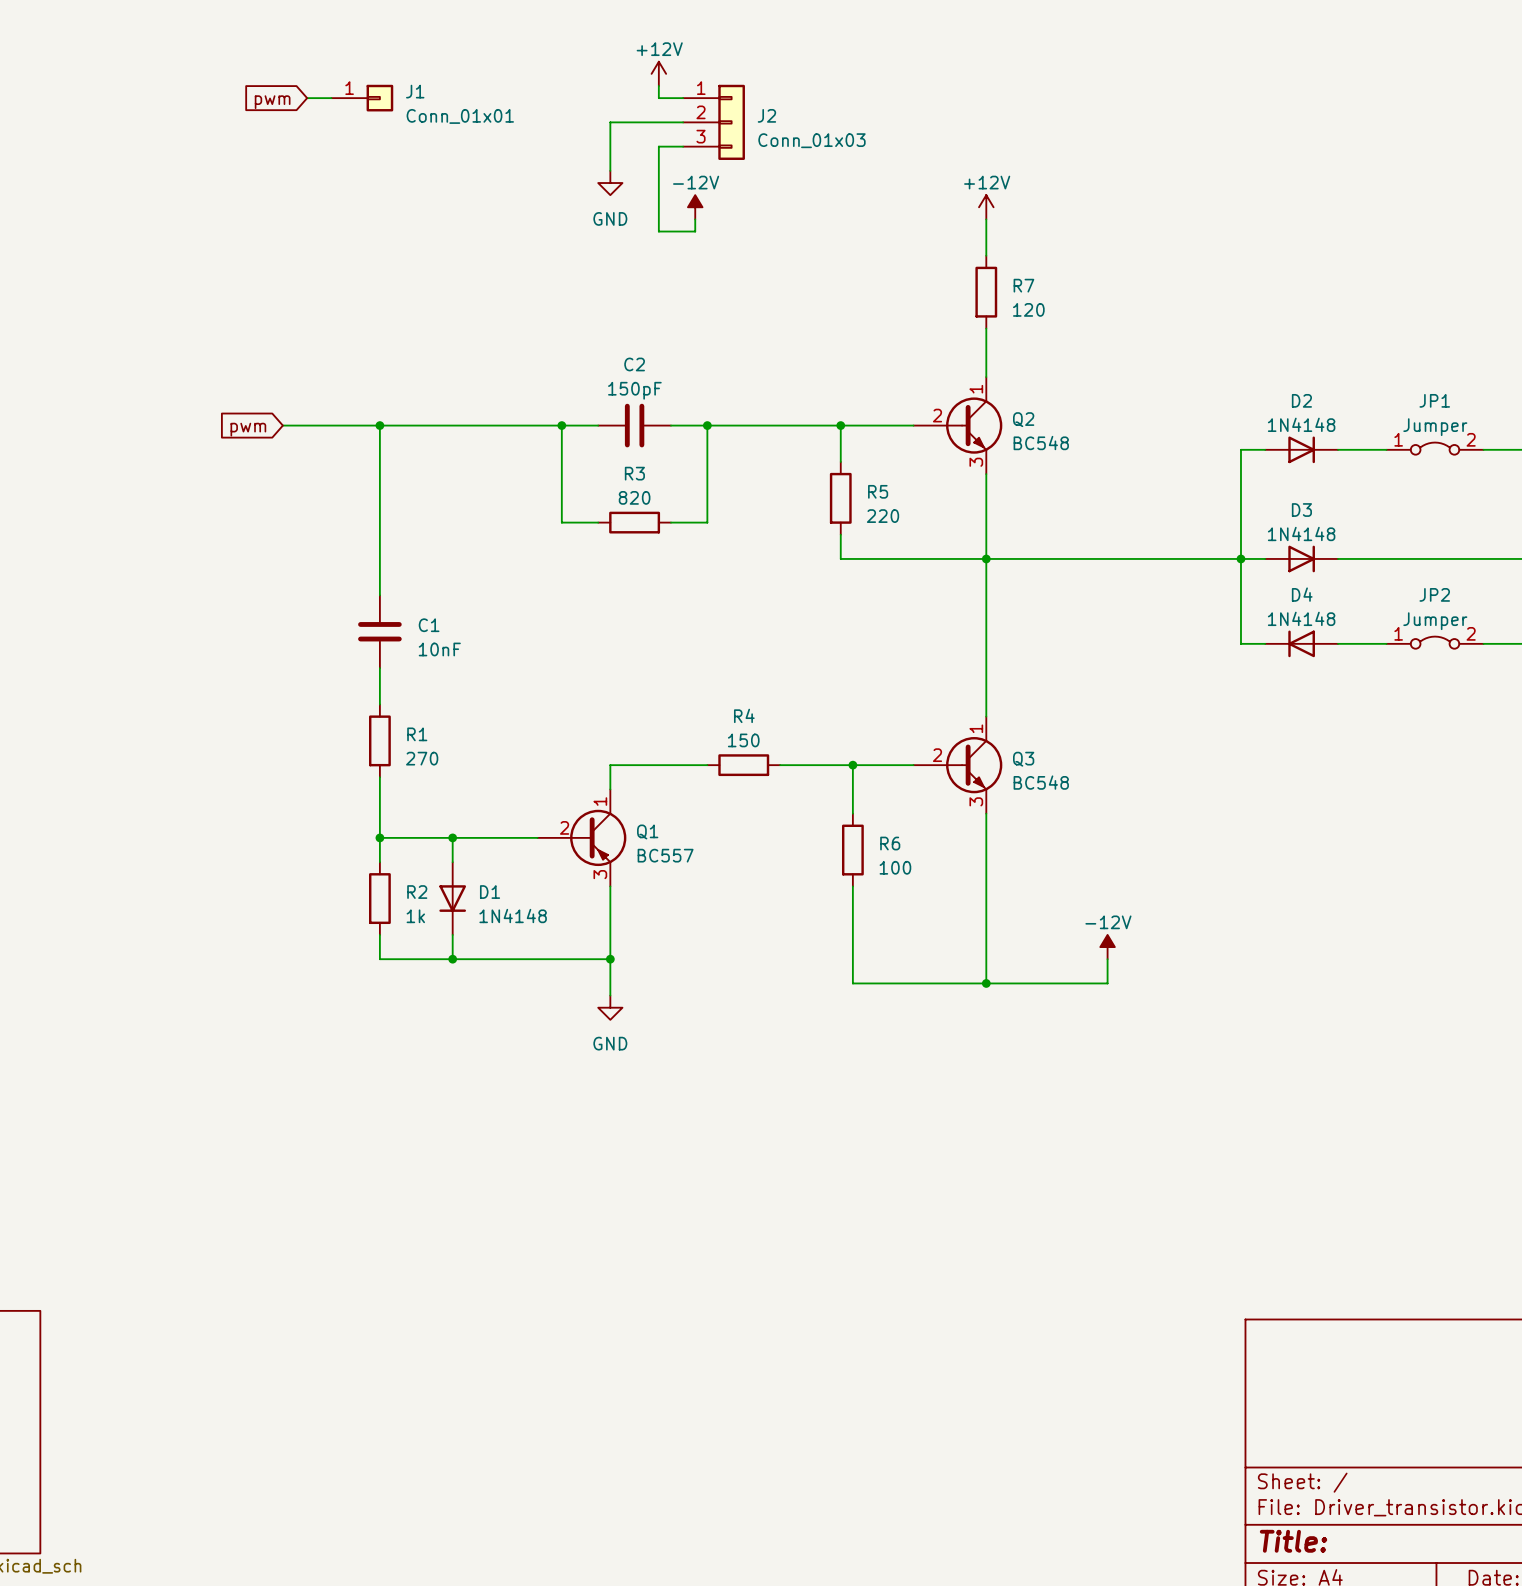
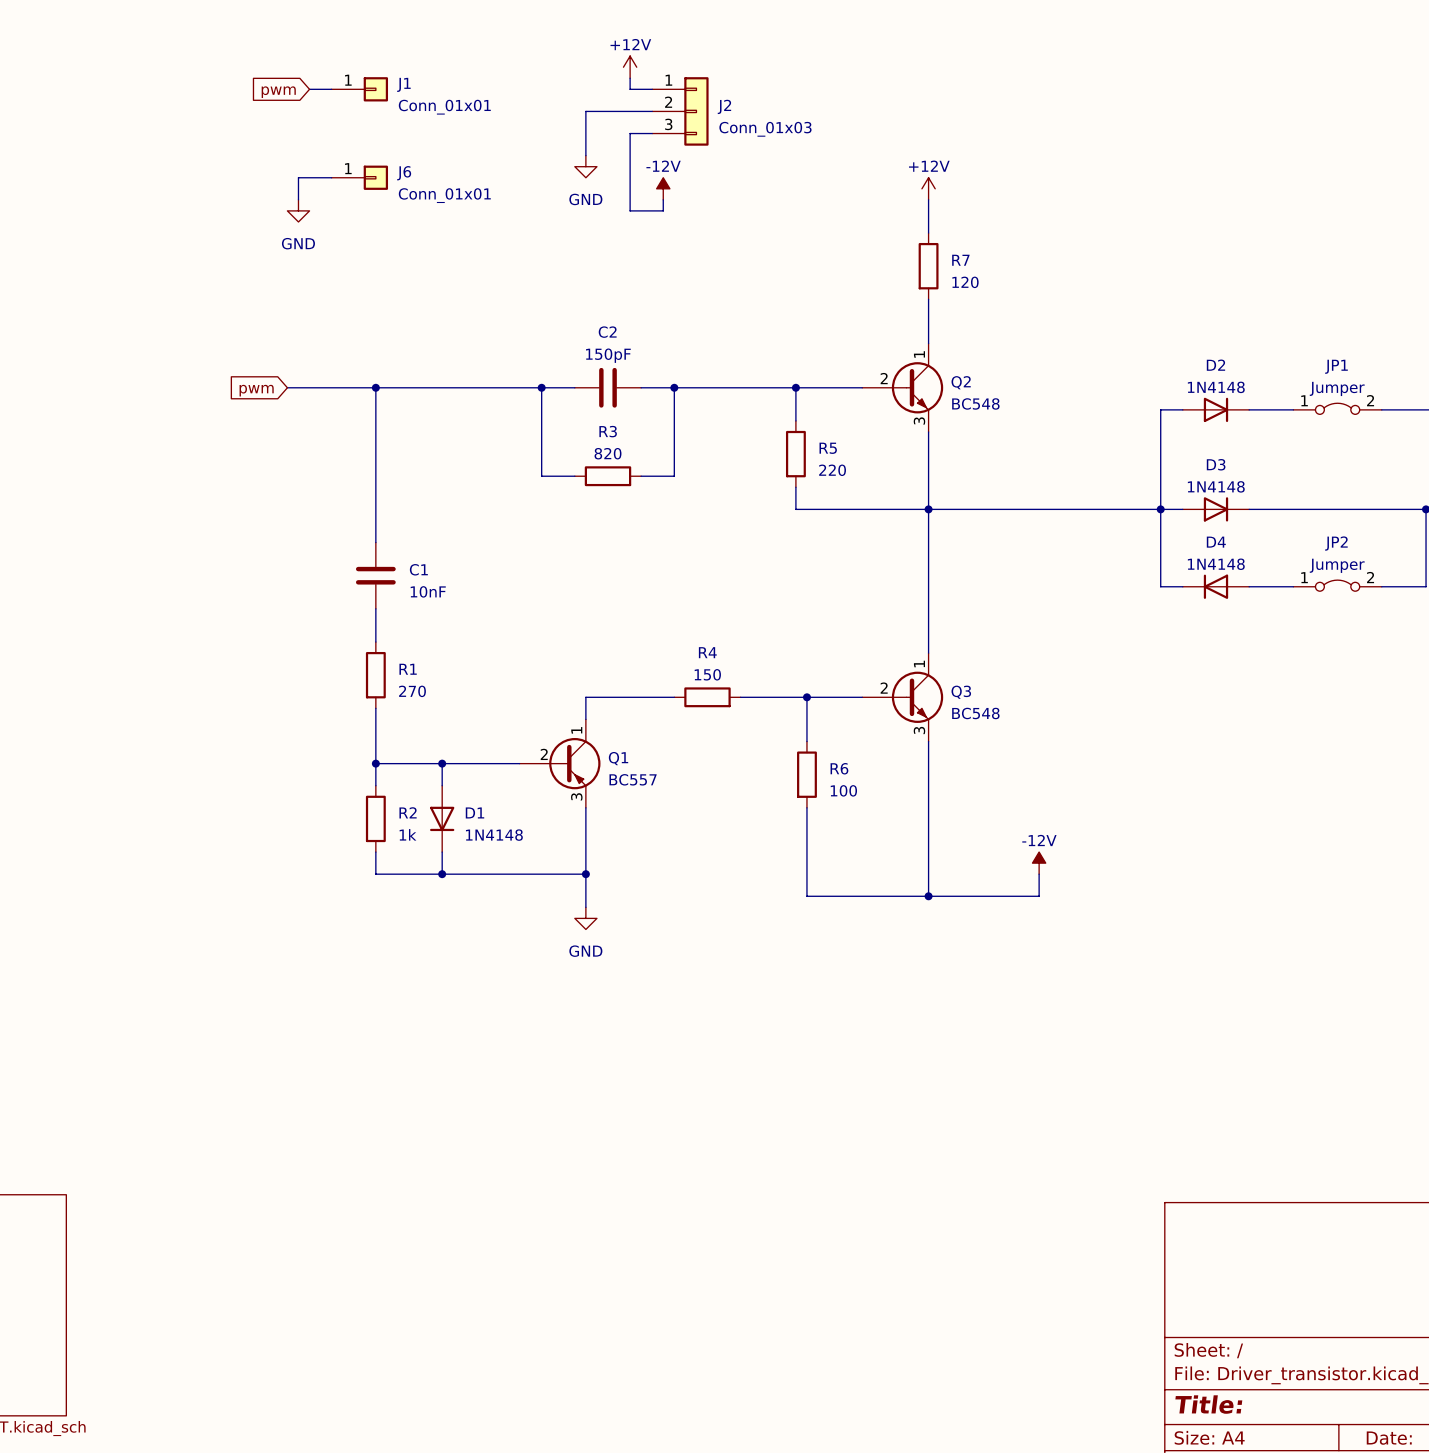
wire: none -> (331, 177) (298, 177) (298, 199)
J6: none -> Conn_01x01 (359, 177)
power symbol: none -> GND (298, 210)

